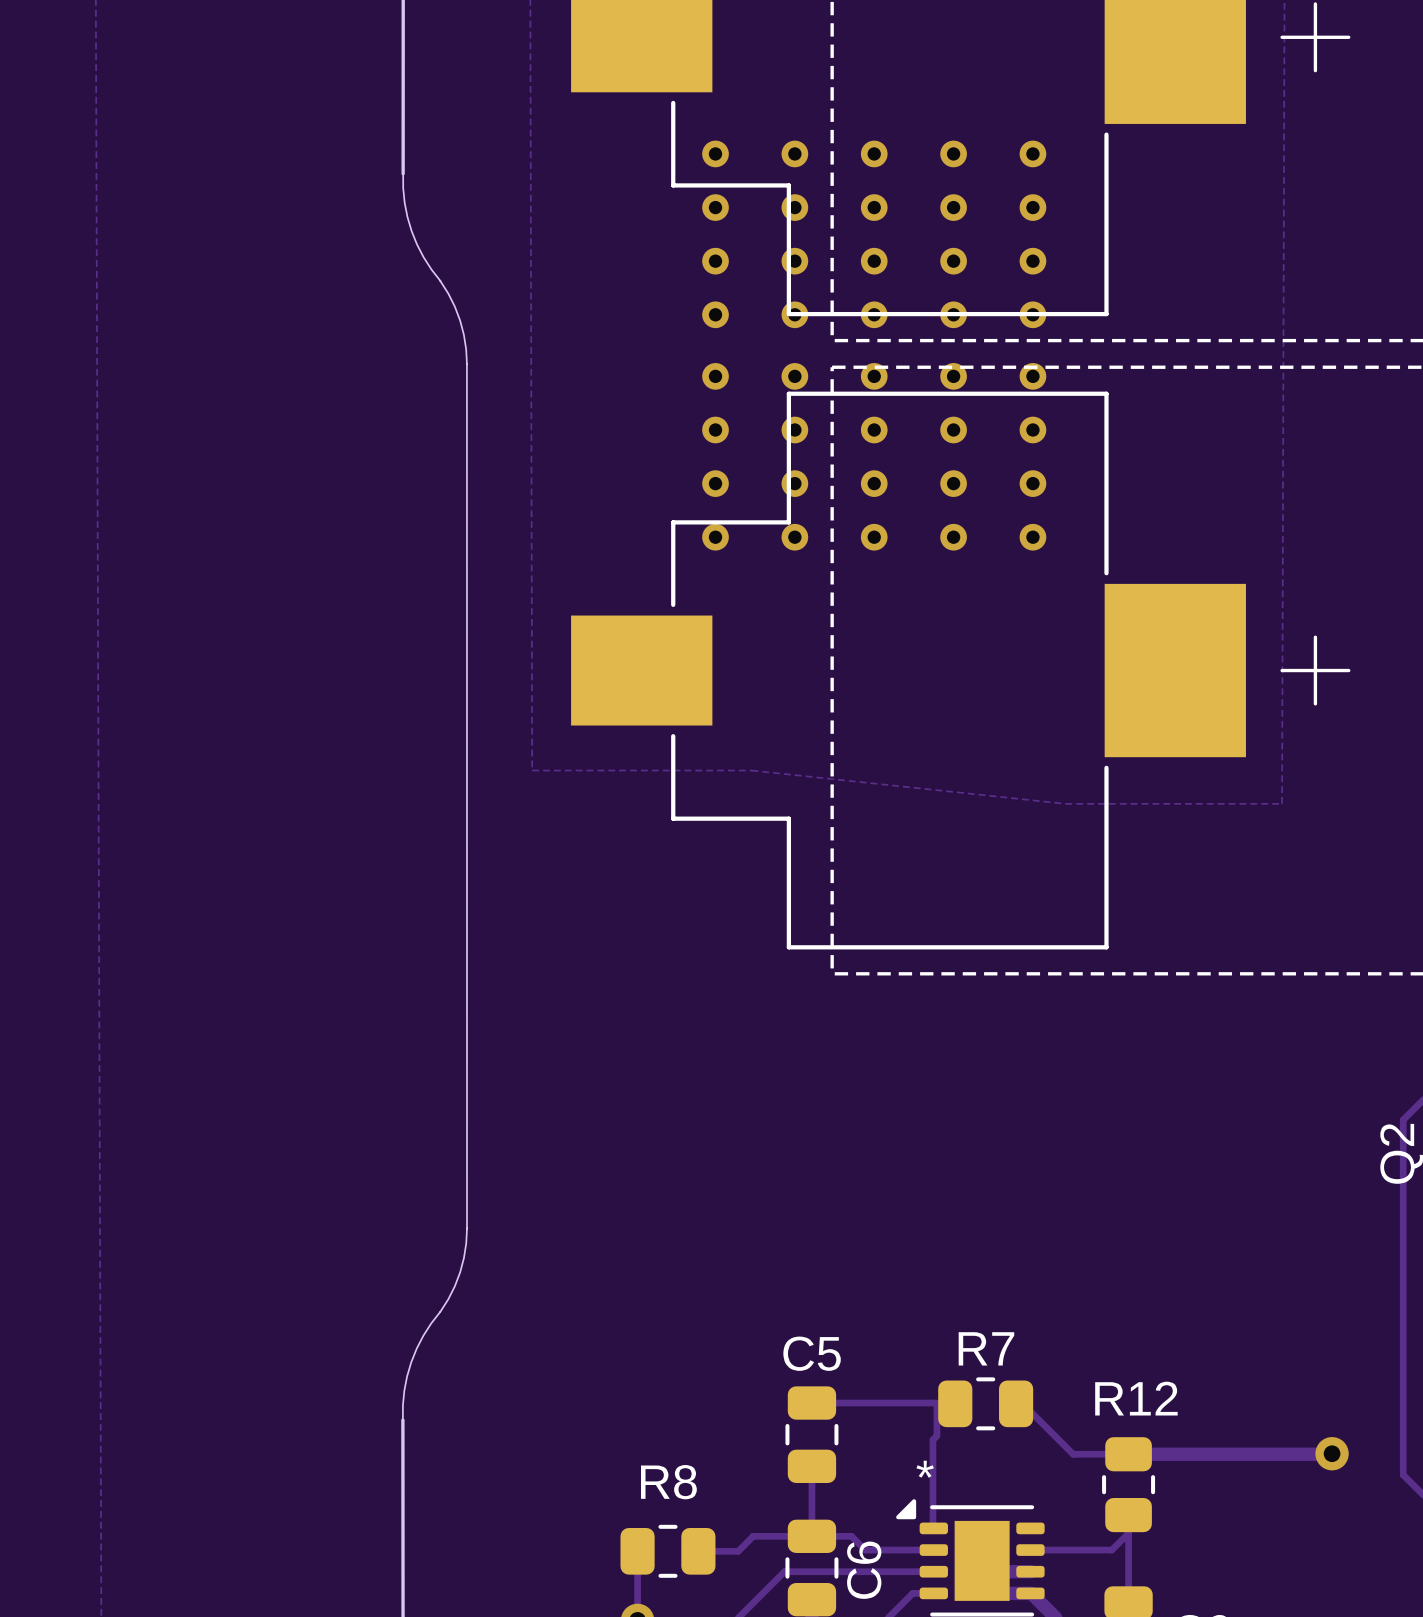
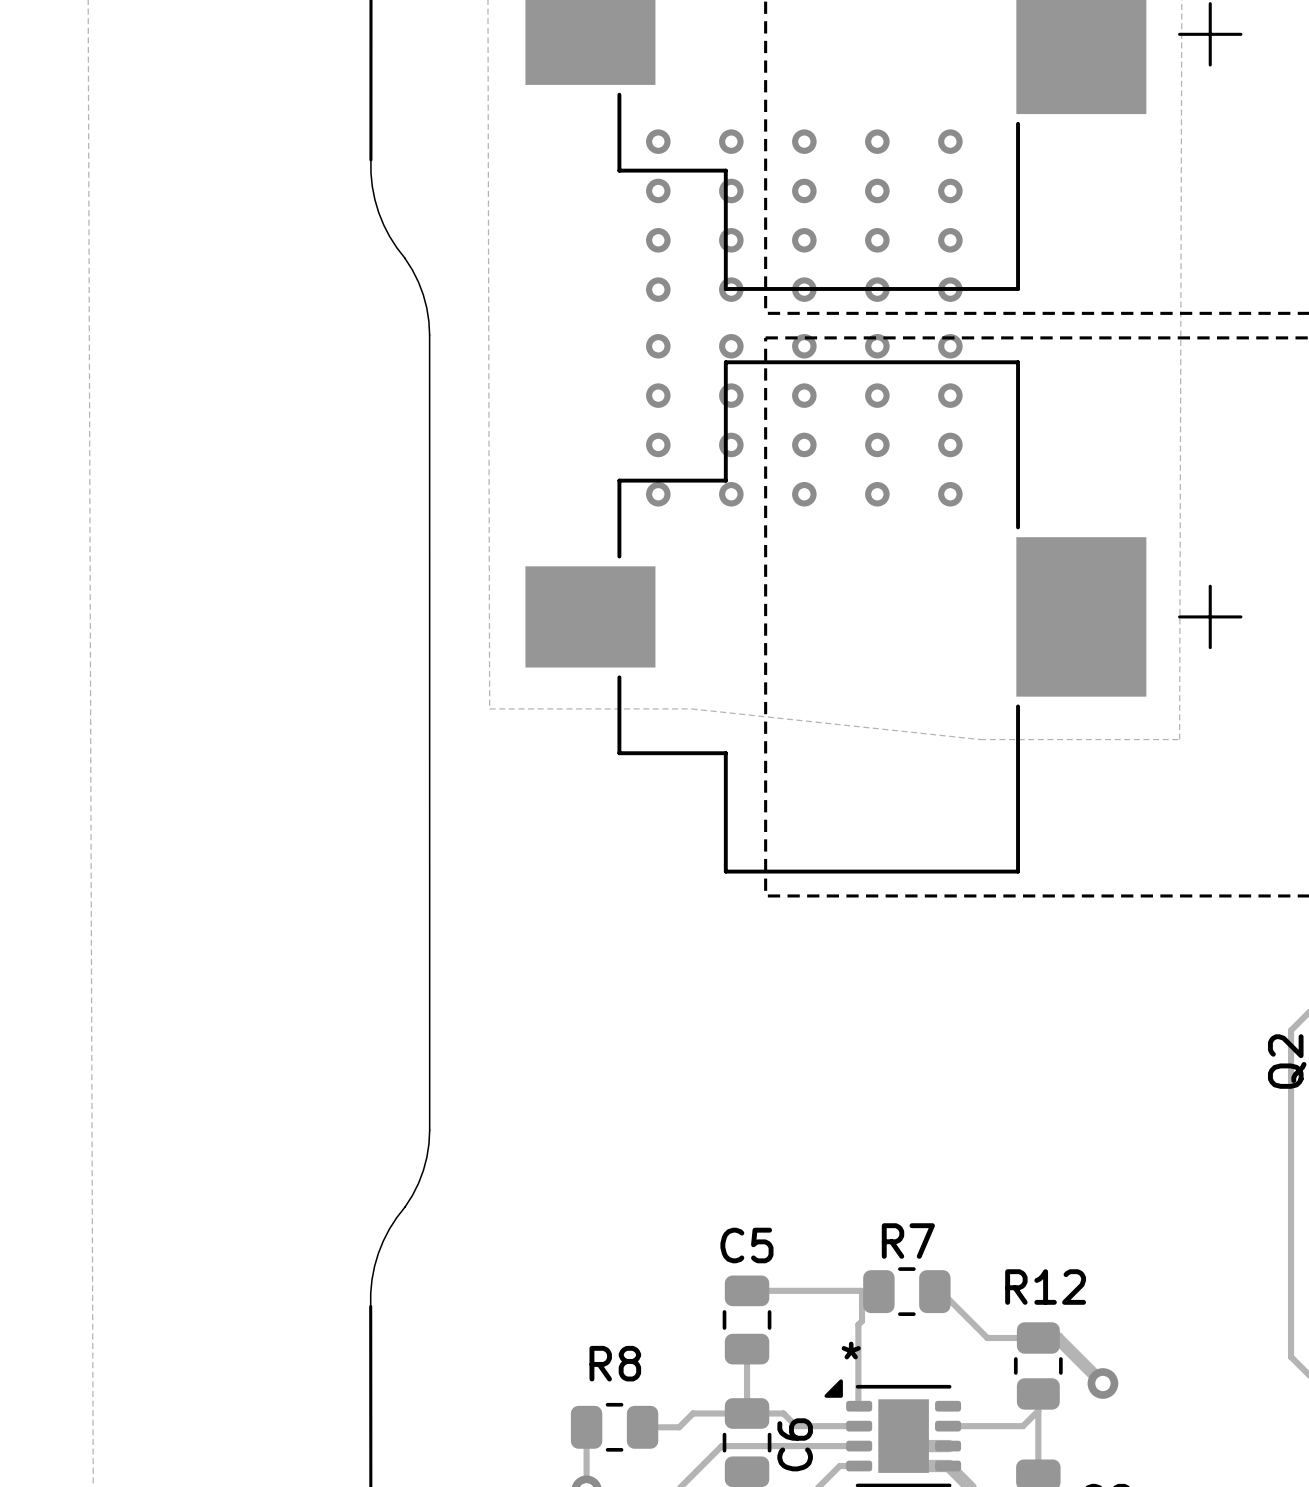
track: (1332, 1453) (1149, 1454) -> (1102, 1383) (1057, 1337)
via position: (1332, 1453) -> (1102, 1383)

